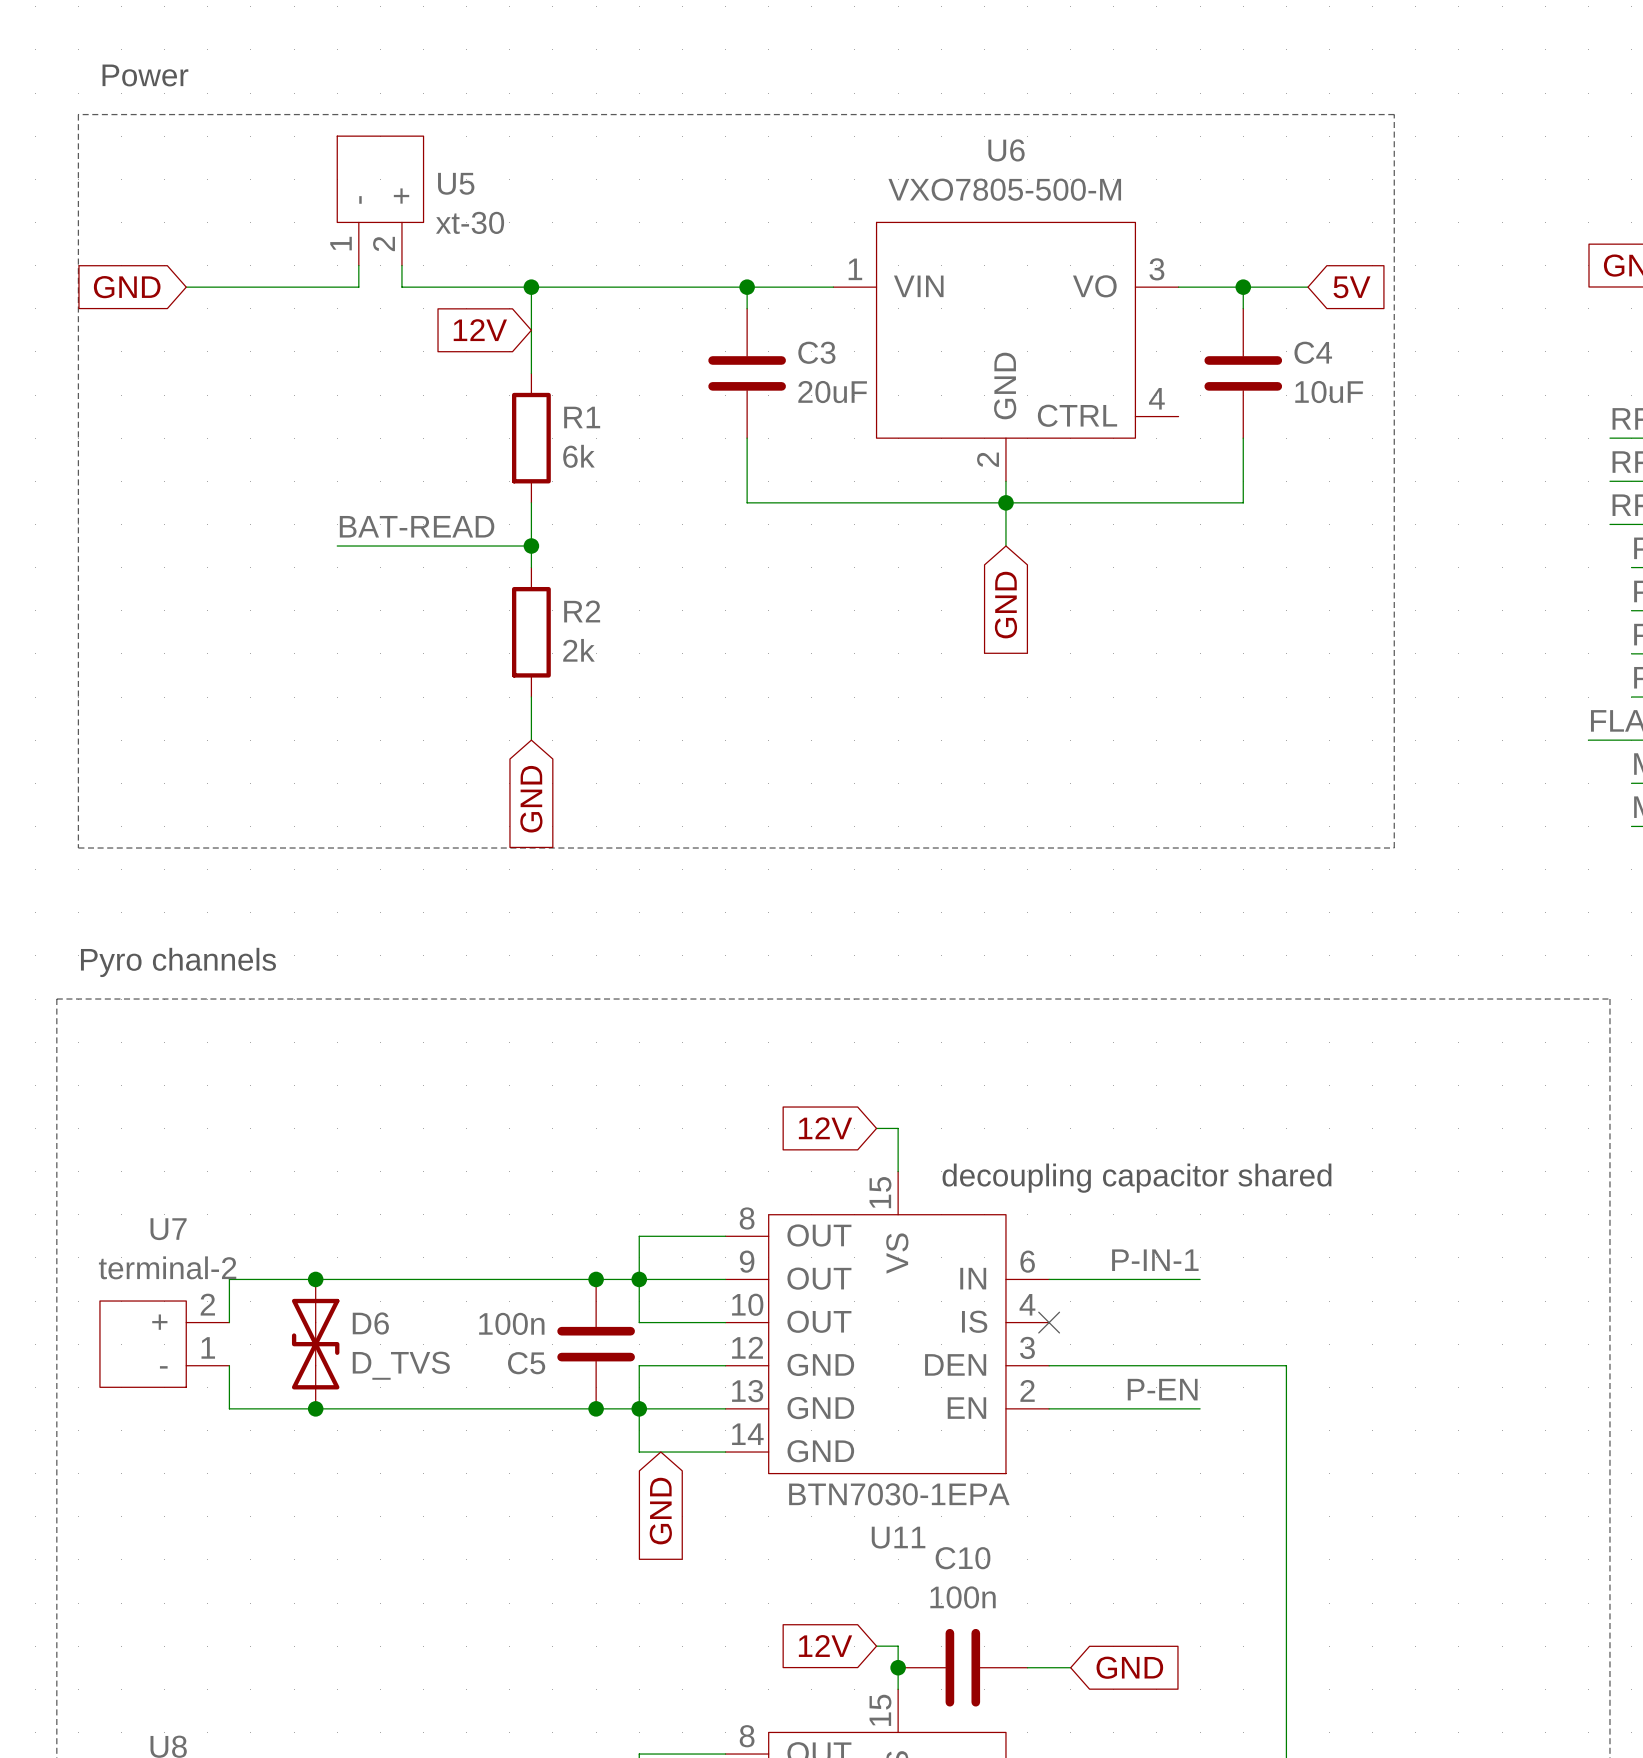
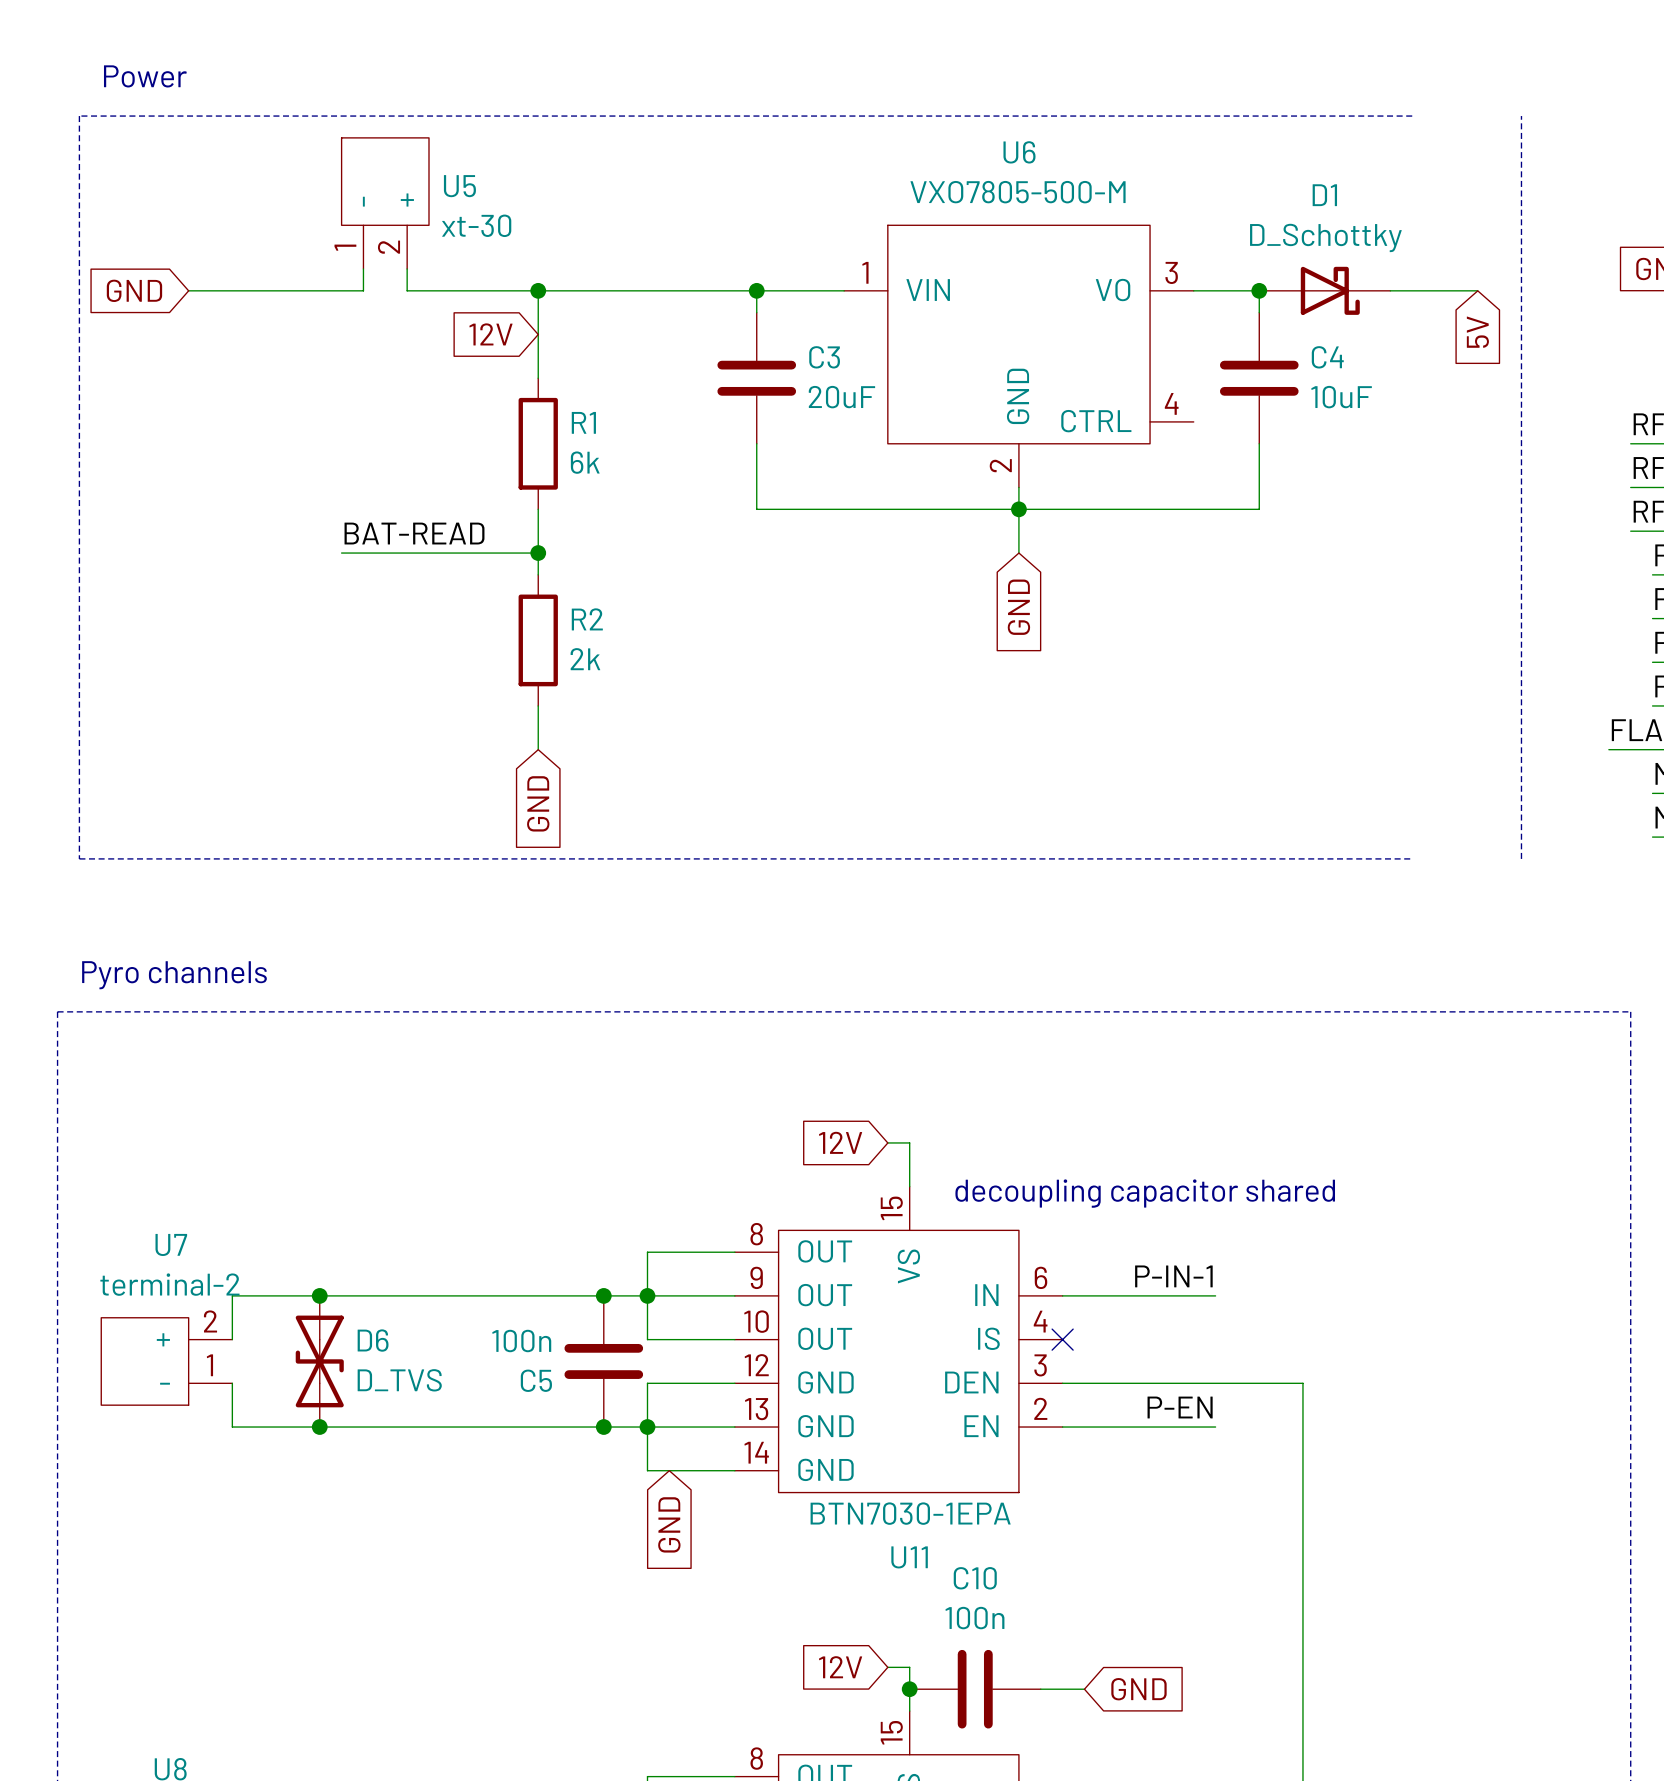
line: (1394, 114) (1394, 848) -> (1521, 116) (1521, 858)
D1: none -> D_Schottky (1324, 290)
global label rotation: 0° (1351, 287) -> 90° clockwise (1477, 332)
global label position: 5V (1351, 287) -> 5V (1477, 332)
wire: none -> (1390, 290) (1477, 290)

